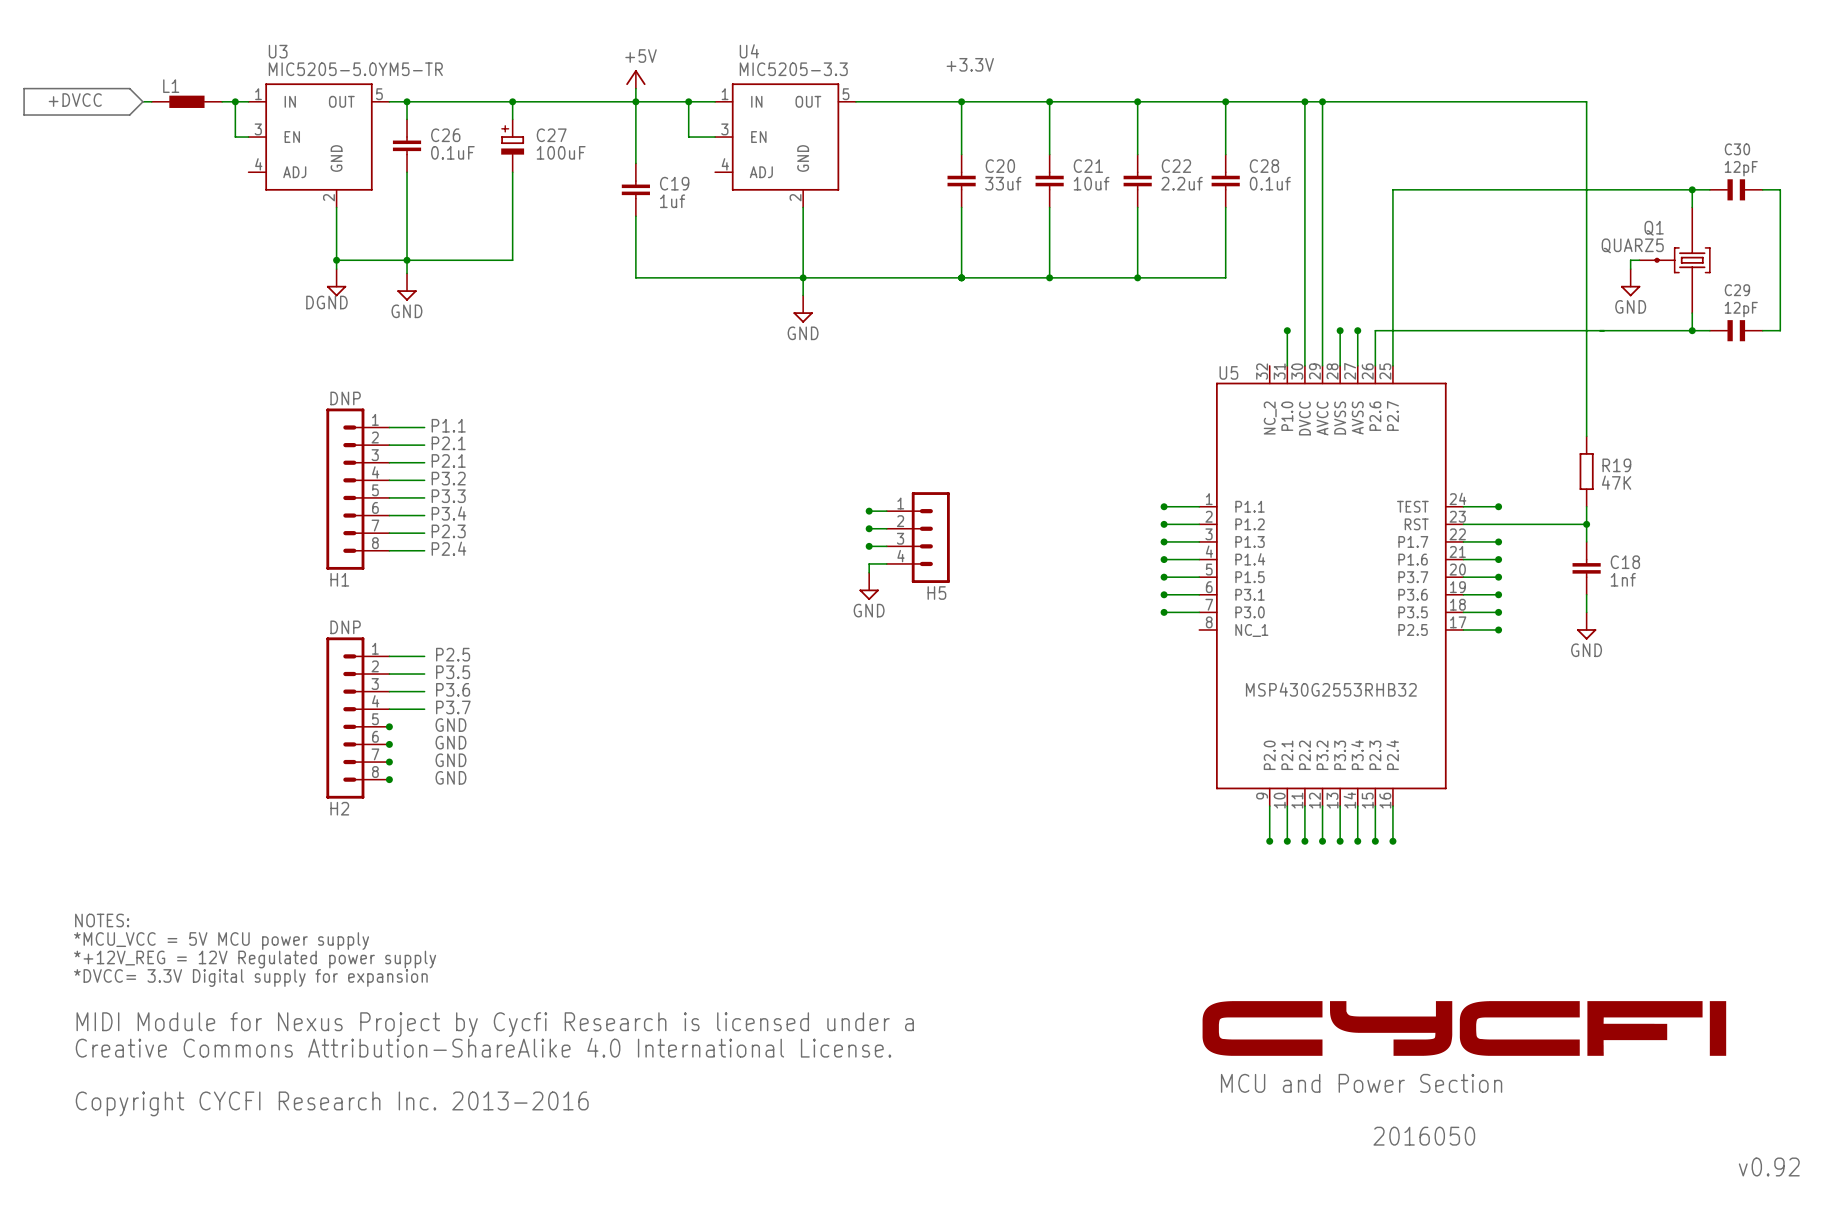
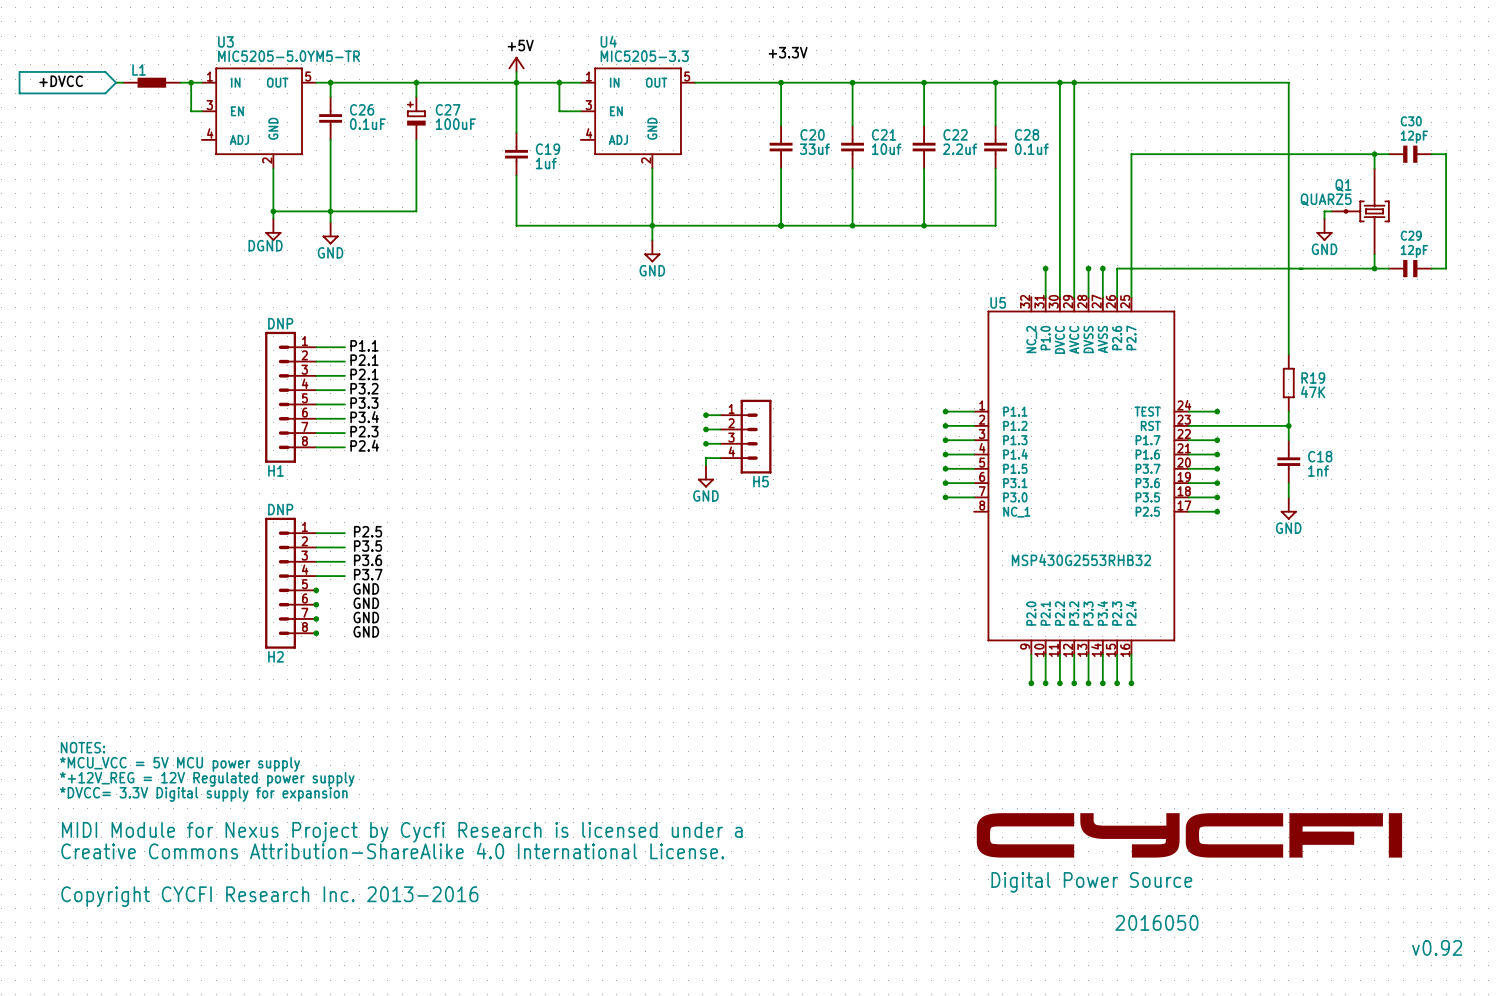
text: MCU and Power Section (1361, 1083) -> Digital Power Source (1091, 882)

